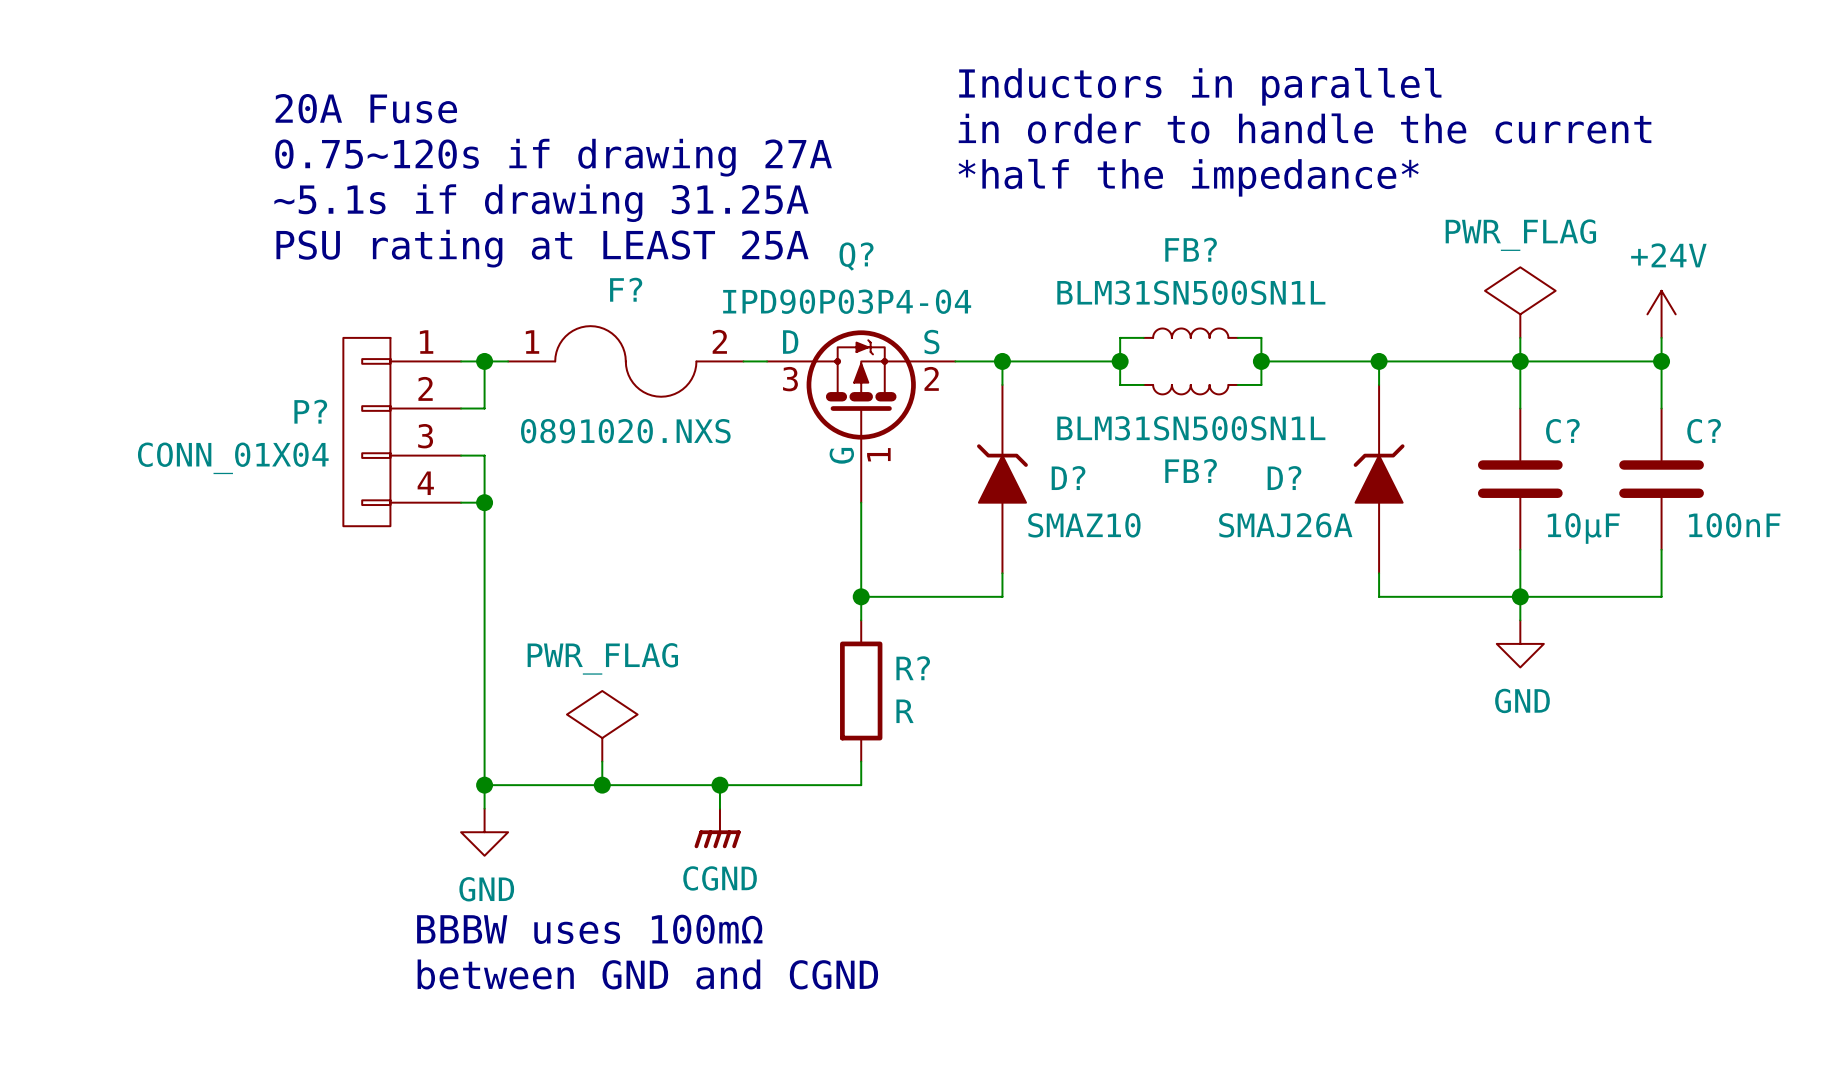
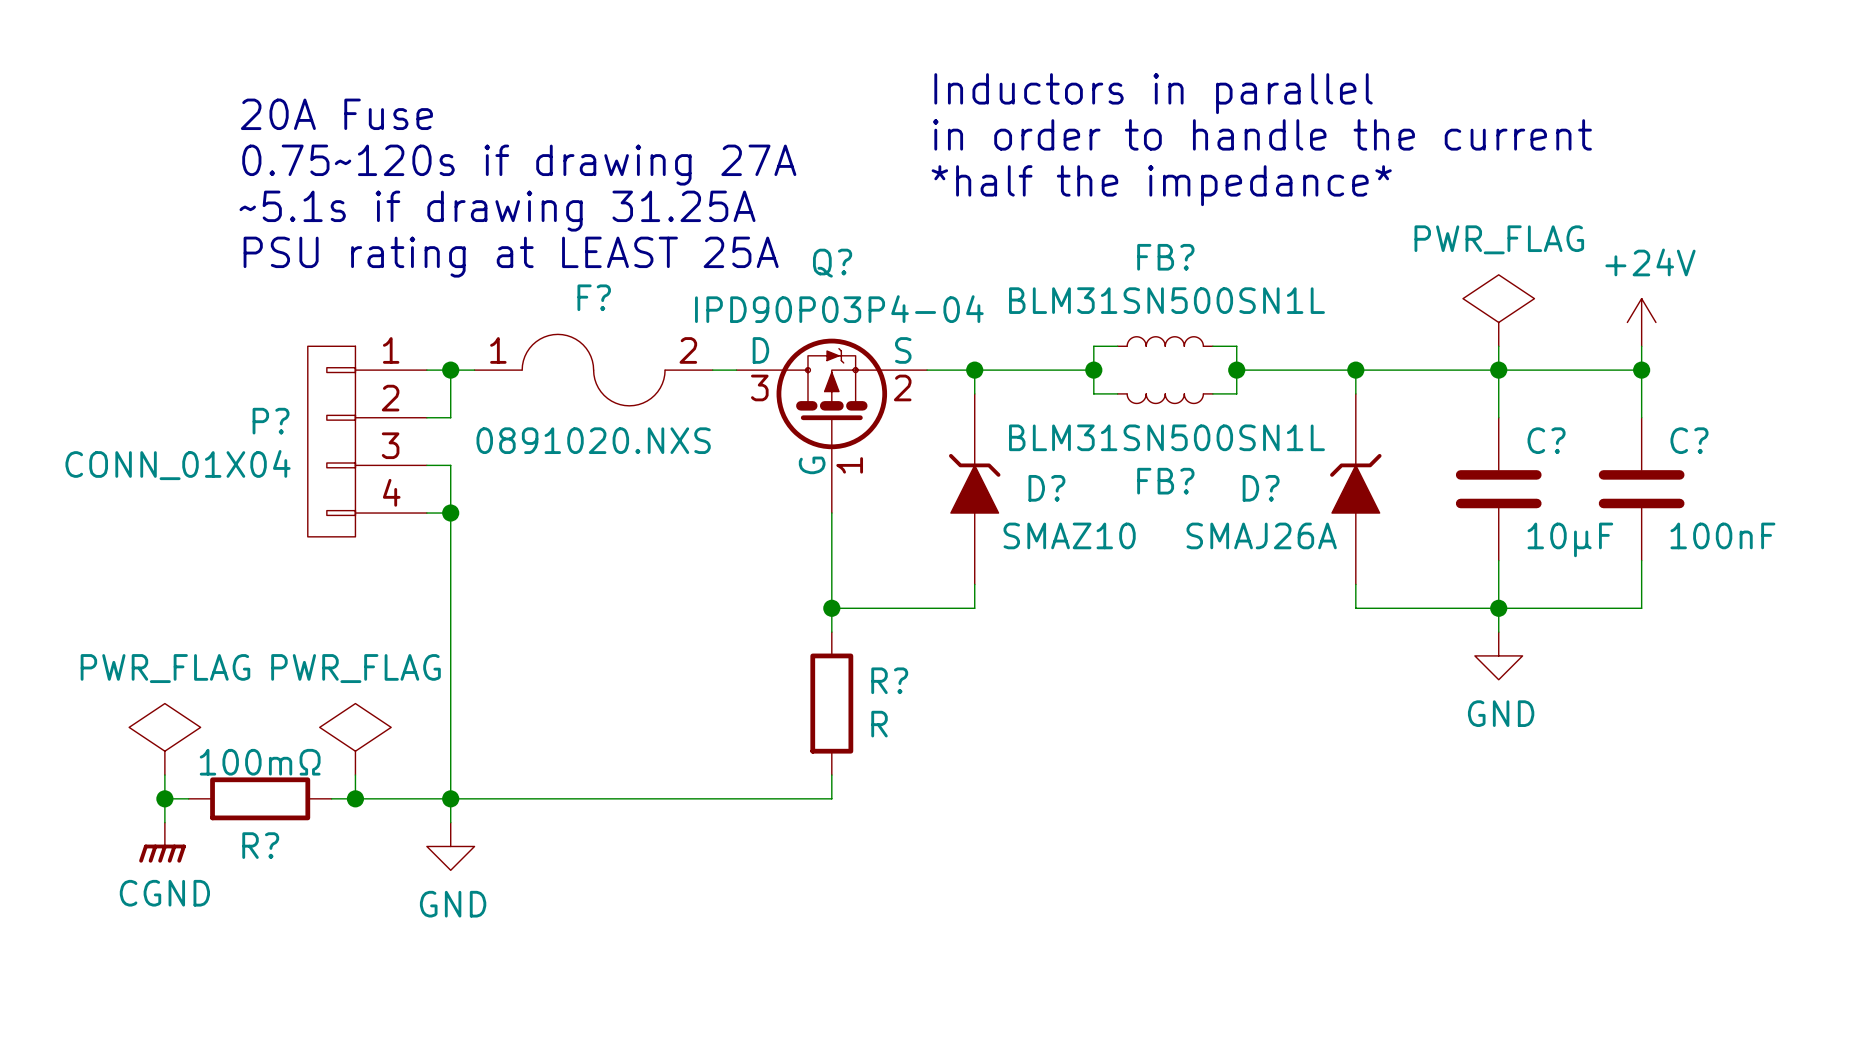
power symbol: none -> PWR_FLAG (164, 739)
power symbol: none -> PWR_FLAG (355, 739)
power symbol: PWR_FLAG (602, 726) -> none
wire: none -> (164, 775) (164, 822)
wire: (602, 761) (602, 785) -> (355, 775) (355, 798)
wire: none -> (164, 798) (188, 798)
junction: none -> (164, 798)
R?: none -> 100mΩ (260, 798)
wire: none -> (331, 798) (450, 798)
junction: none -> (355, 798)
junction: (602, 785) -> none
wire: (719, 785) (719, 808) -> none
junction: (719, 785) -> none
power symbol: none -> CGND (162, 842)
power symbol: CGND (717, 828) -> none
text: BBBW uses 100mΩ (589, 929) -> none
text: between GND and CGND (647, 974) -> none

